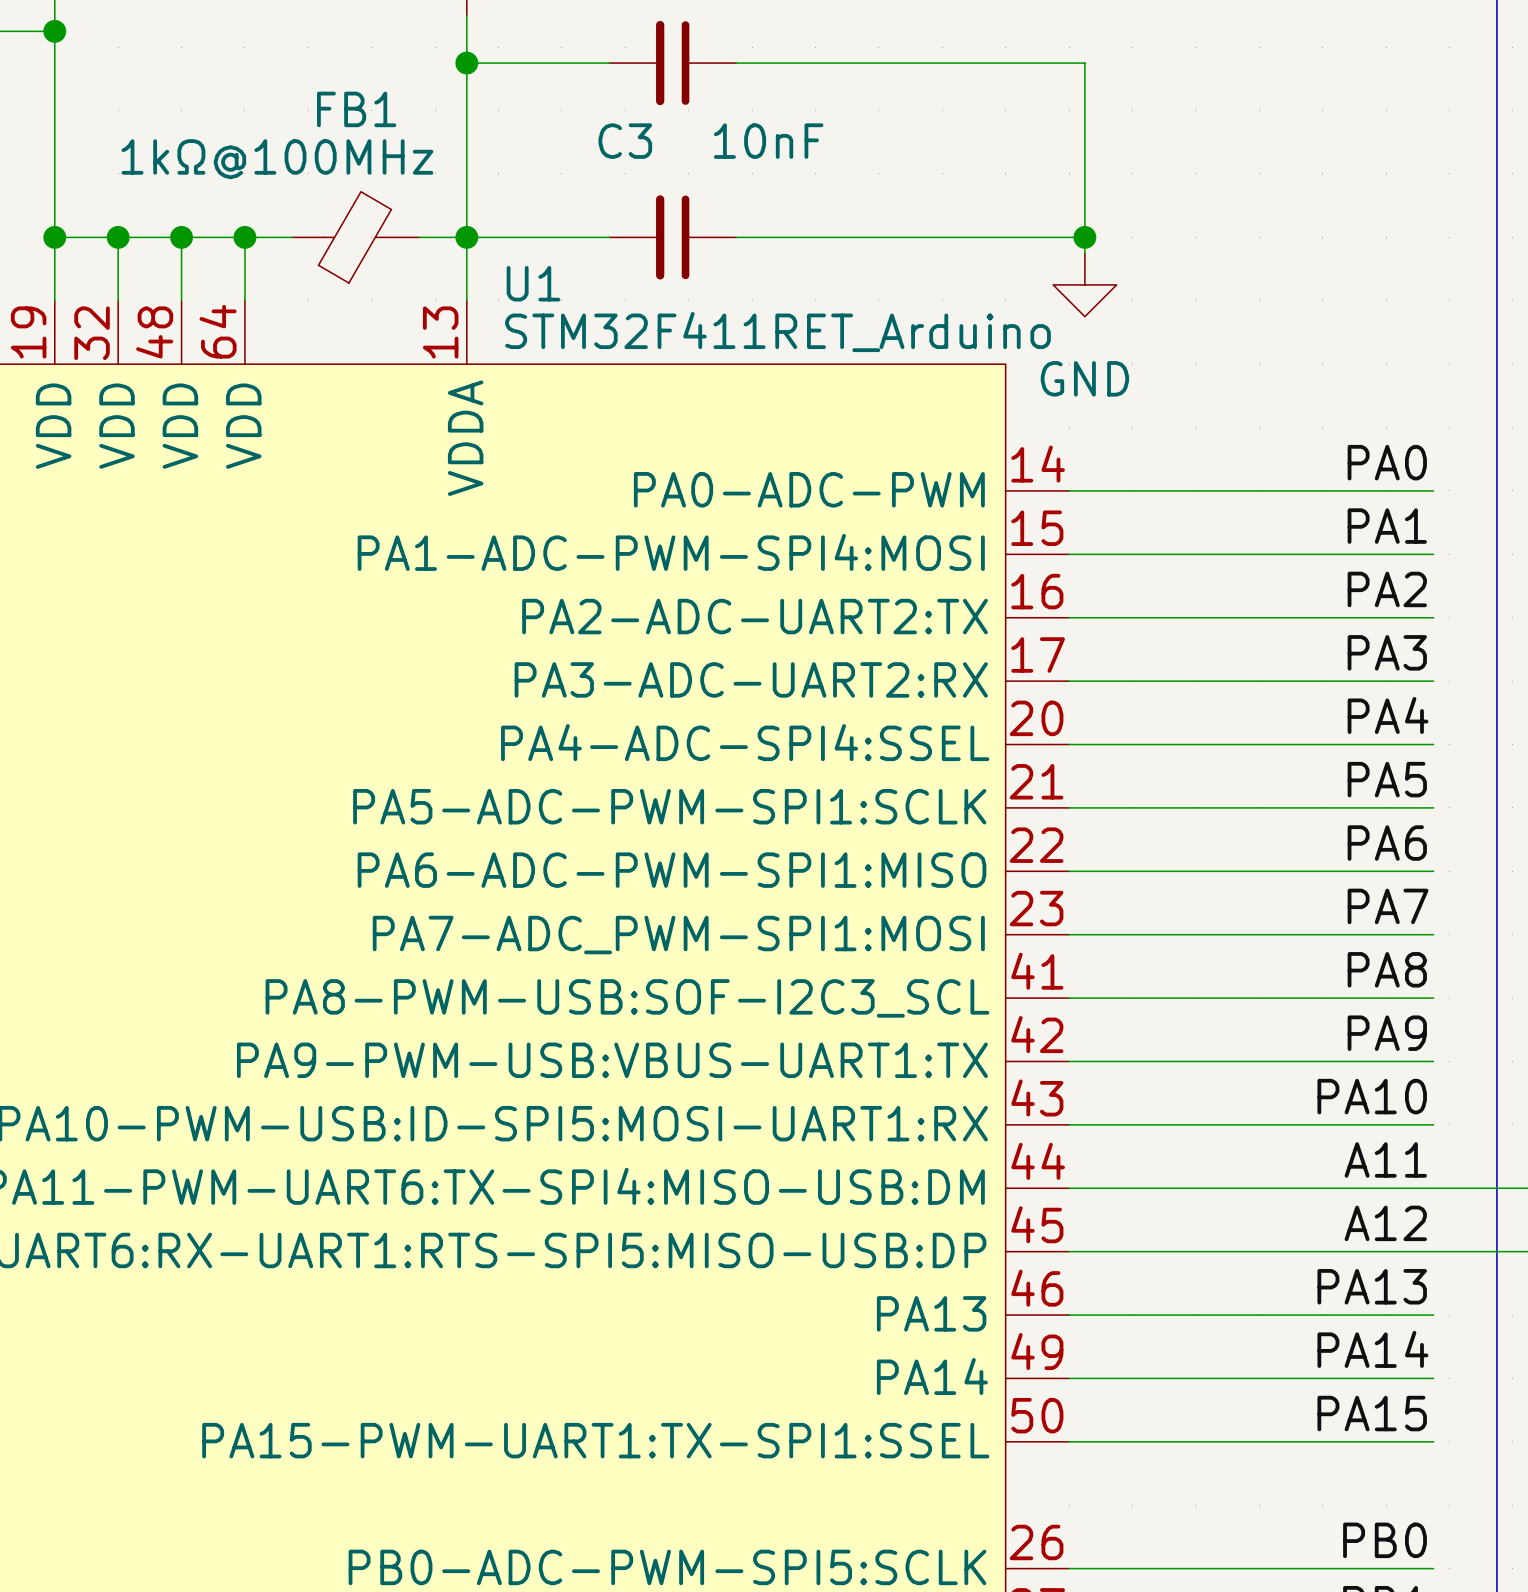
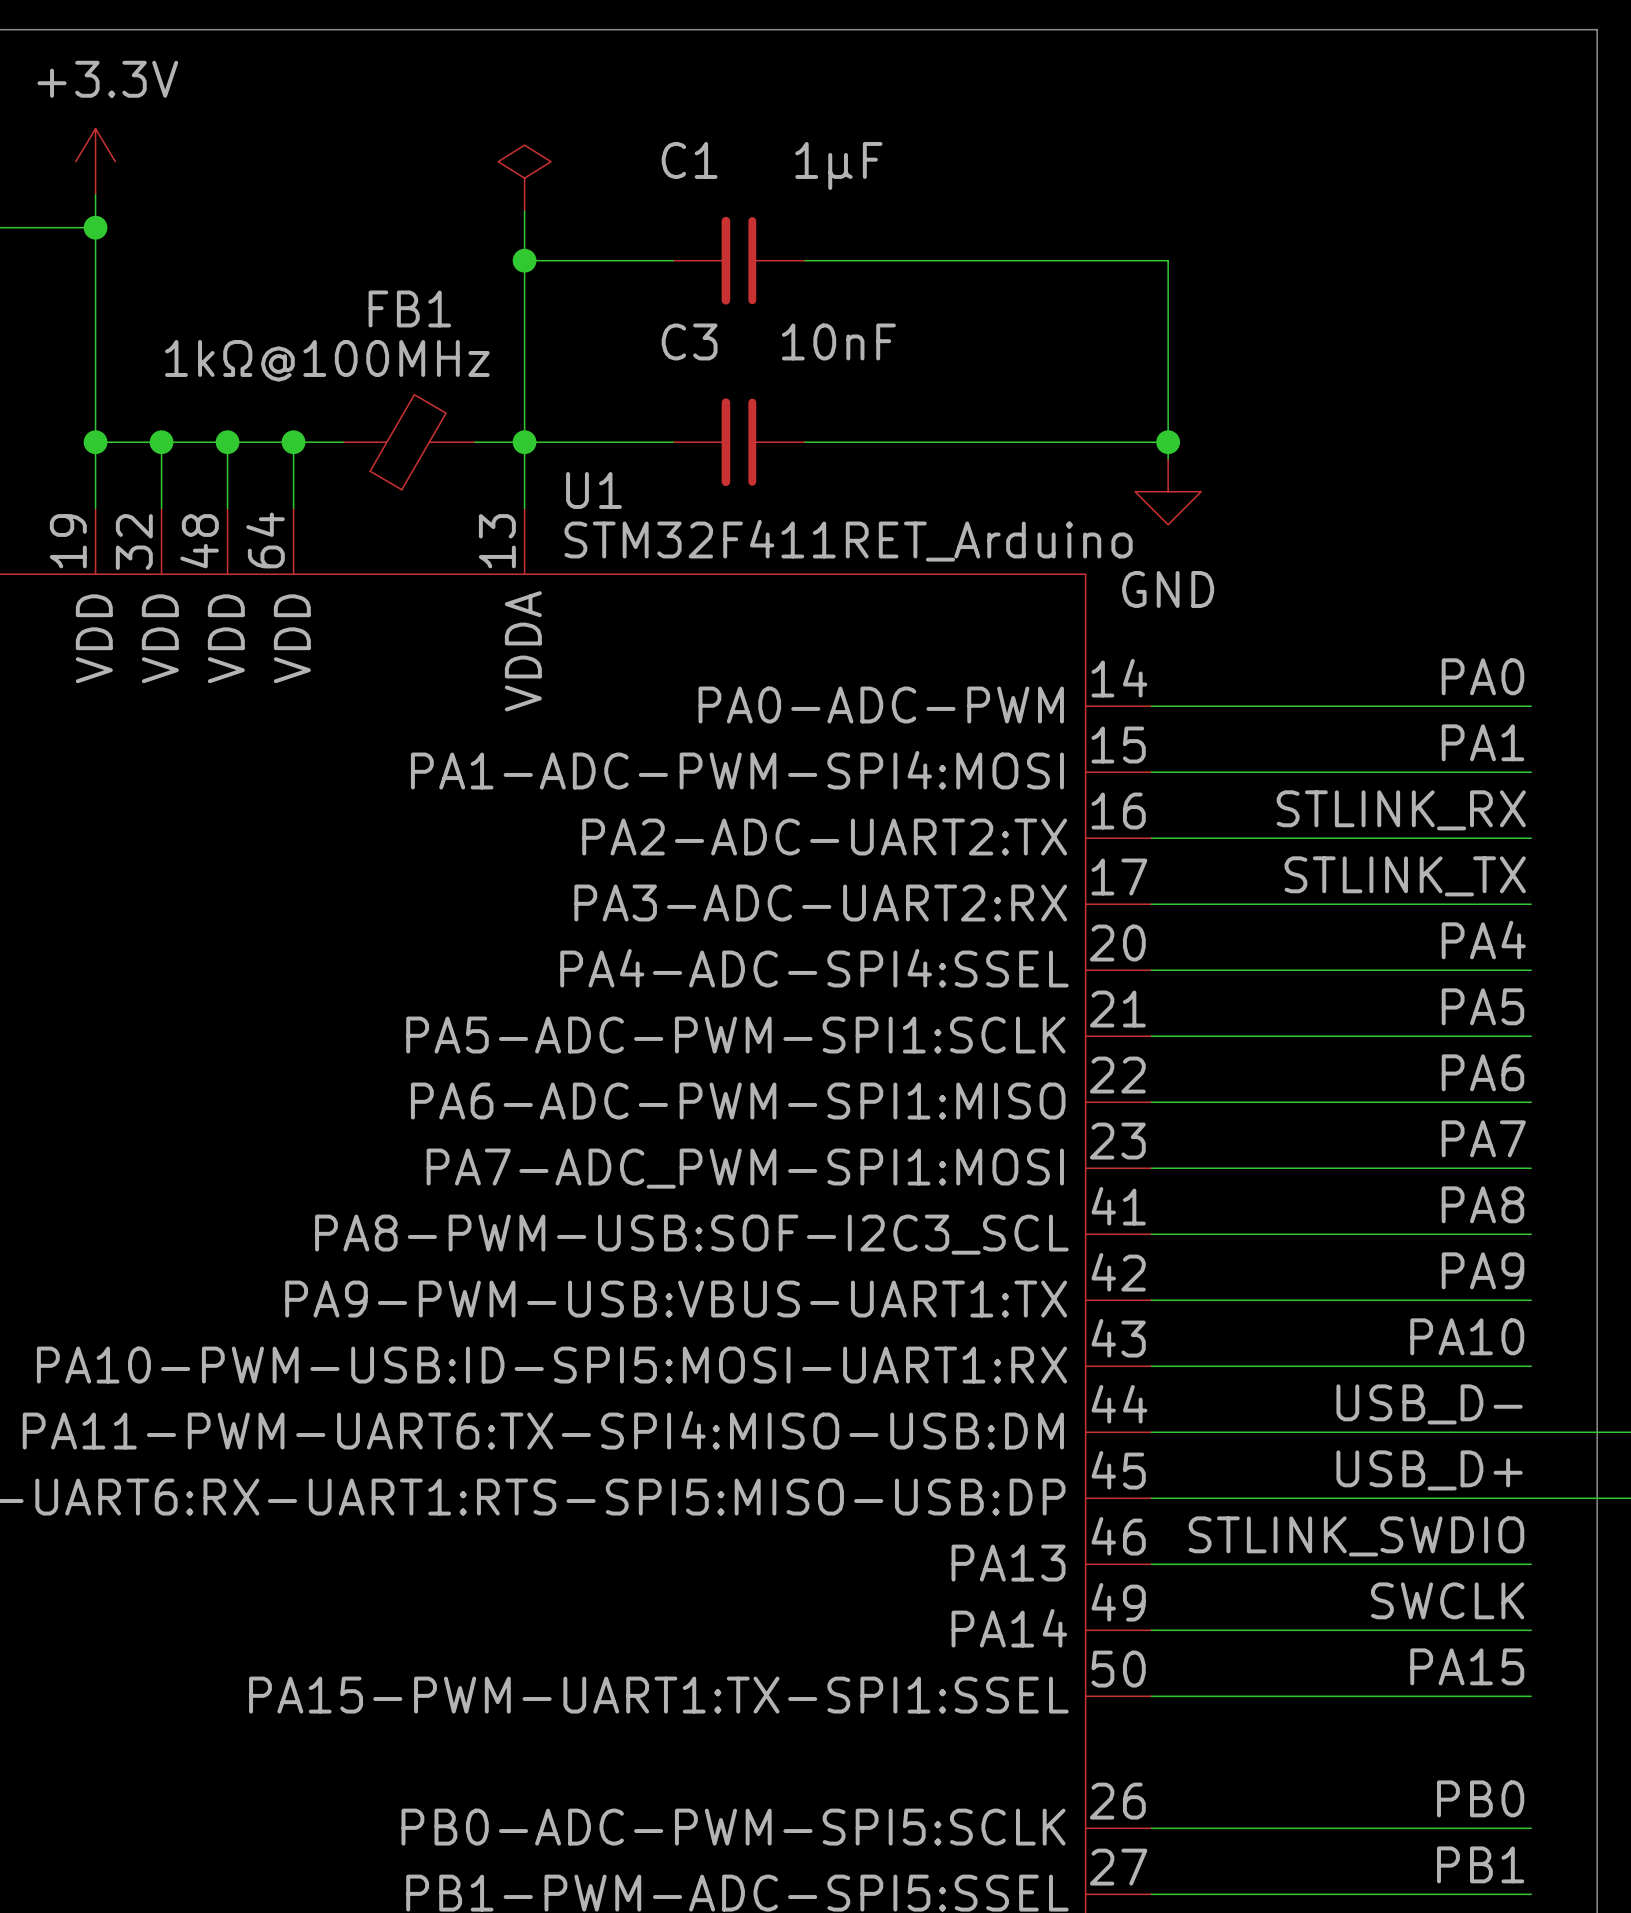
label: PA2 (1387, 589) -> STLINK_RX (1401, 810)
label: PA3 (1387, 652) -> STLINK_TX (1405, 876)
label: A11 (1385, 1159) -> USB_D- (1429, 1404)
label: A12 (1385, 1223) -> USB_D+ (1429, 1470)
label: PA13 (1372, 1286) -> STLINK_SWDIO (1356, 1536)
label: PA14 (1372, 1349) -> SWCLK (1447, 1600)

